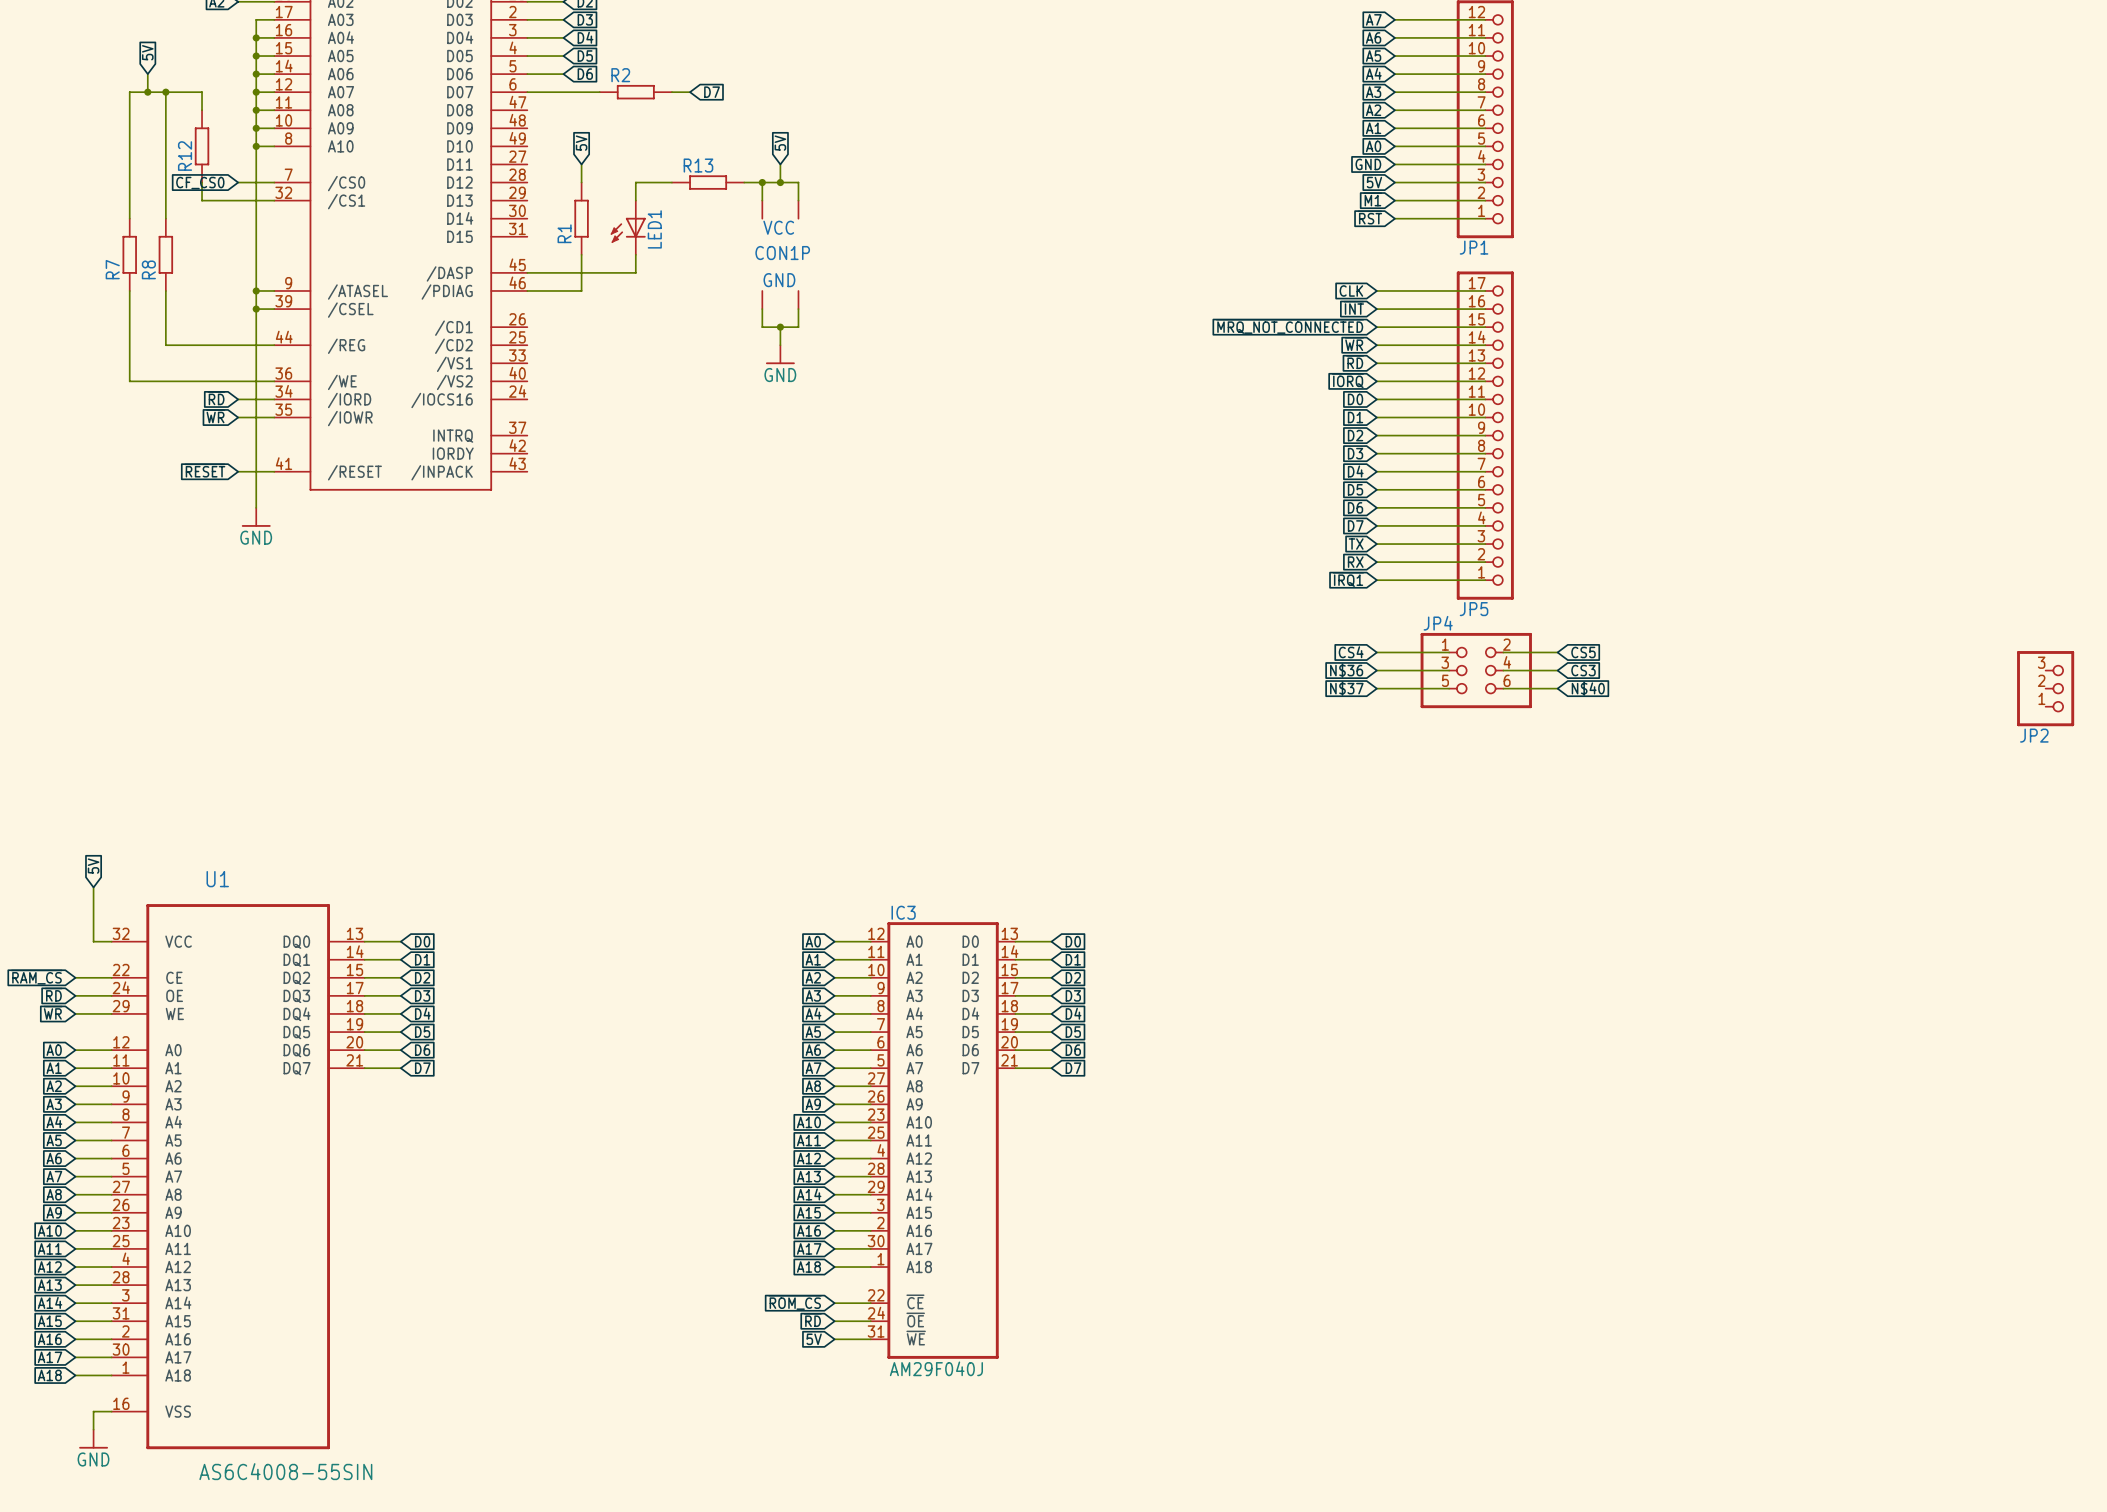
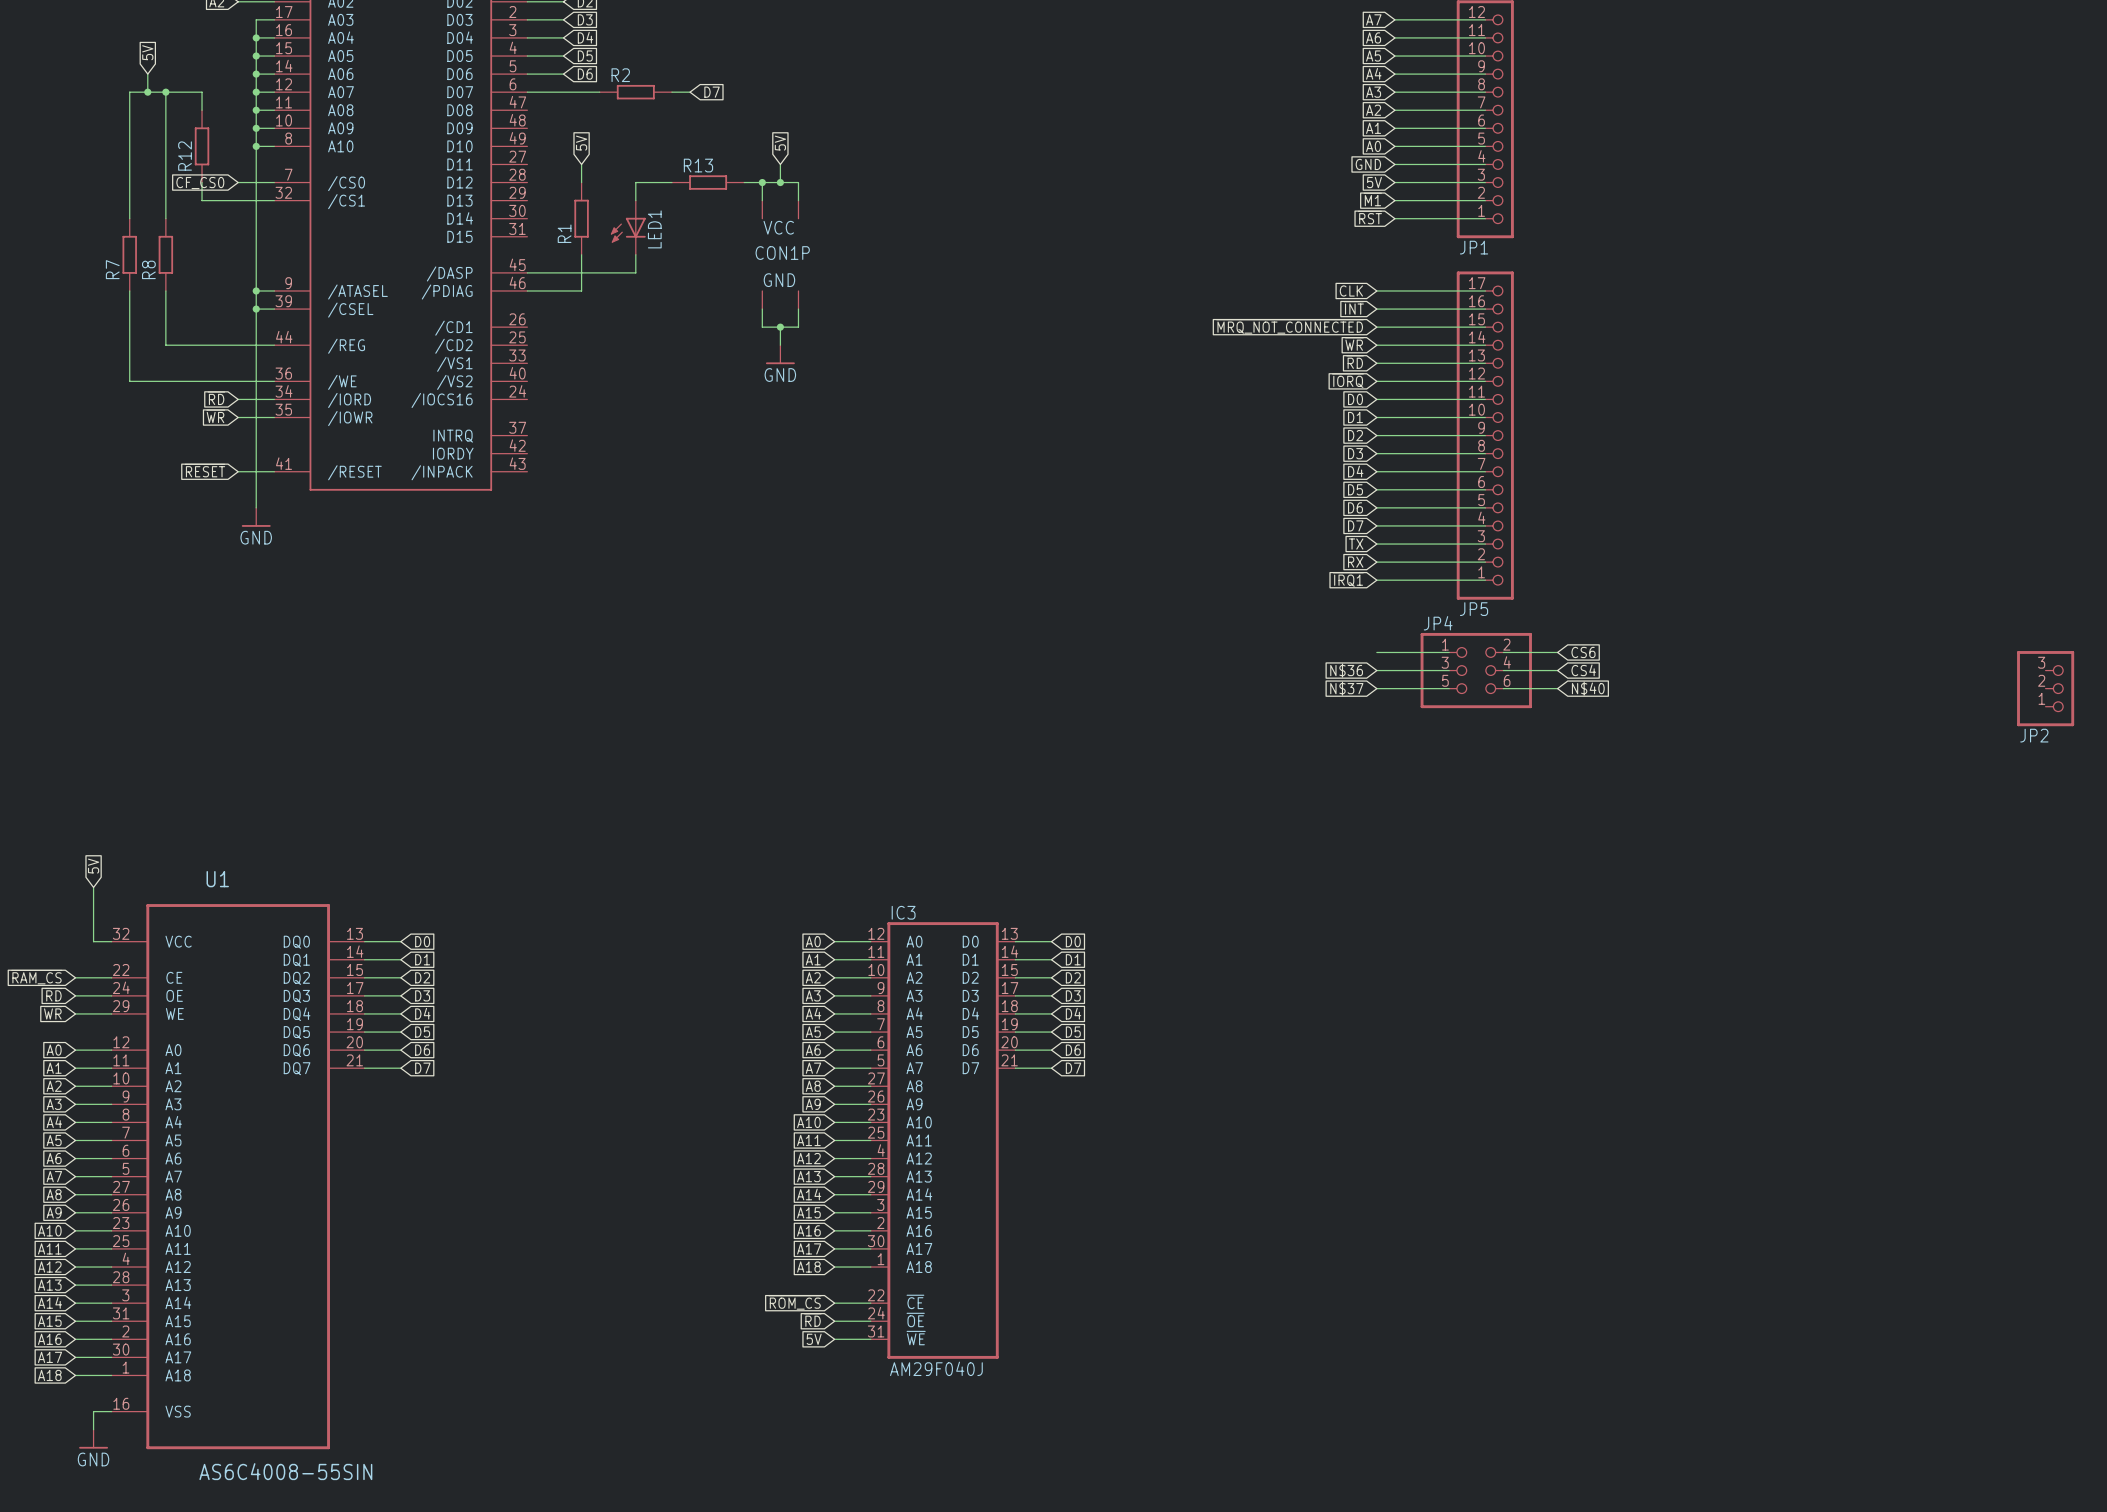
global label: CS4 (1351, 652) -> none
global label: CS5 (1583, 652) -> CS6 (1583, 652)
global label: CS3 (1583, 670) -> CS4 (1583, 670)

